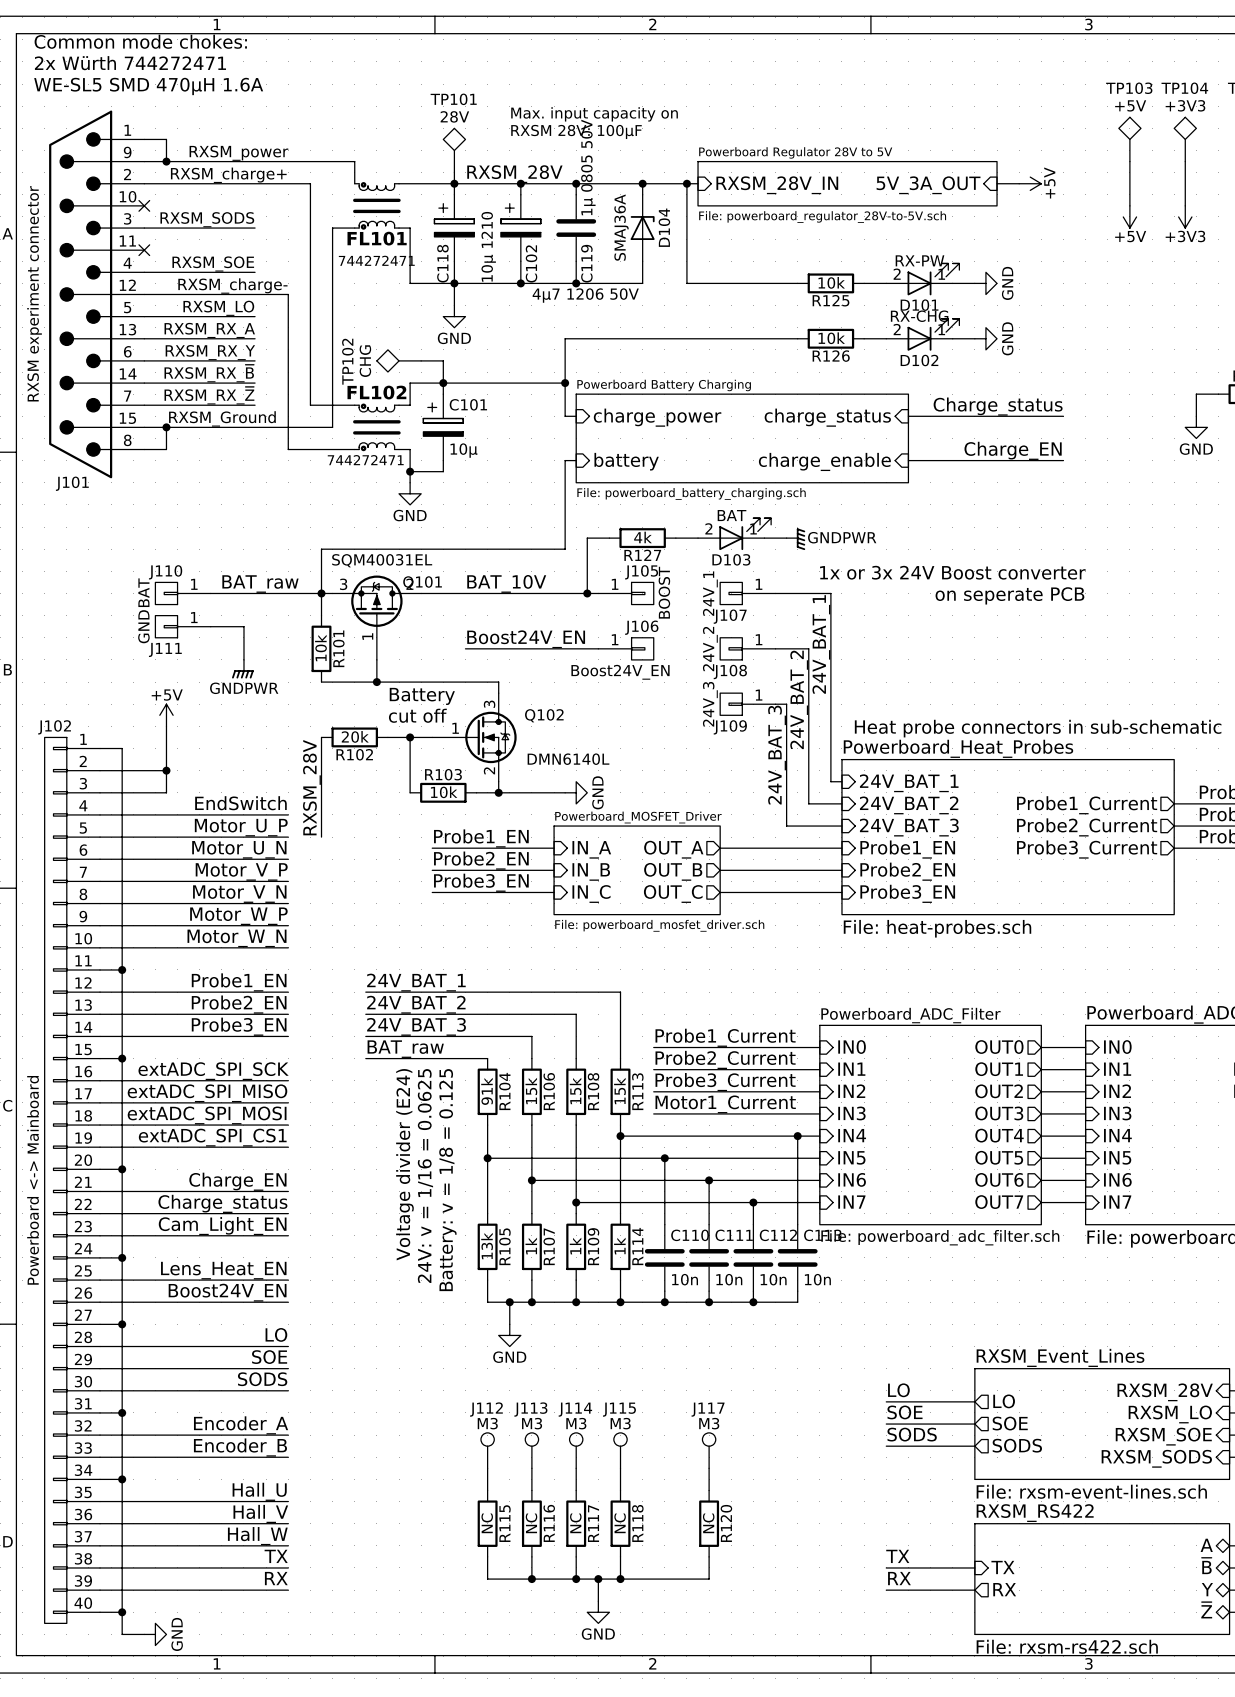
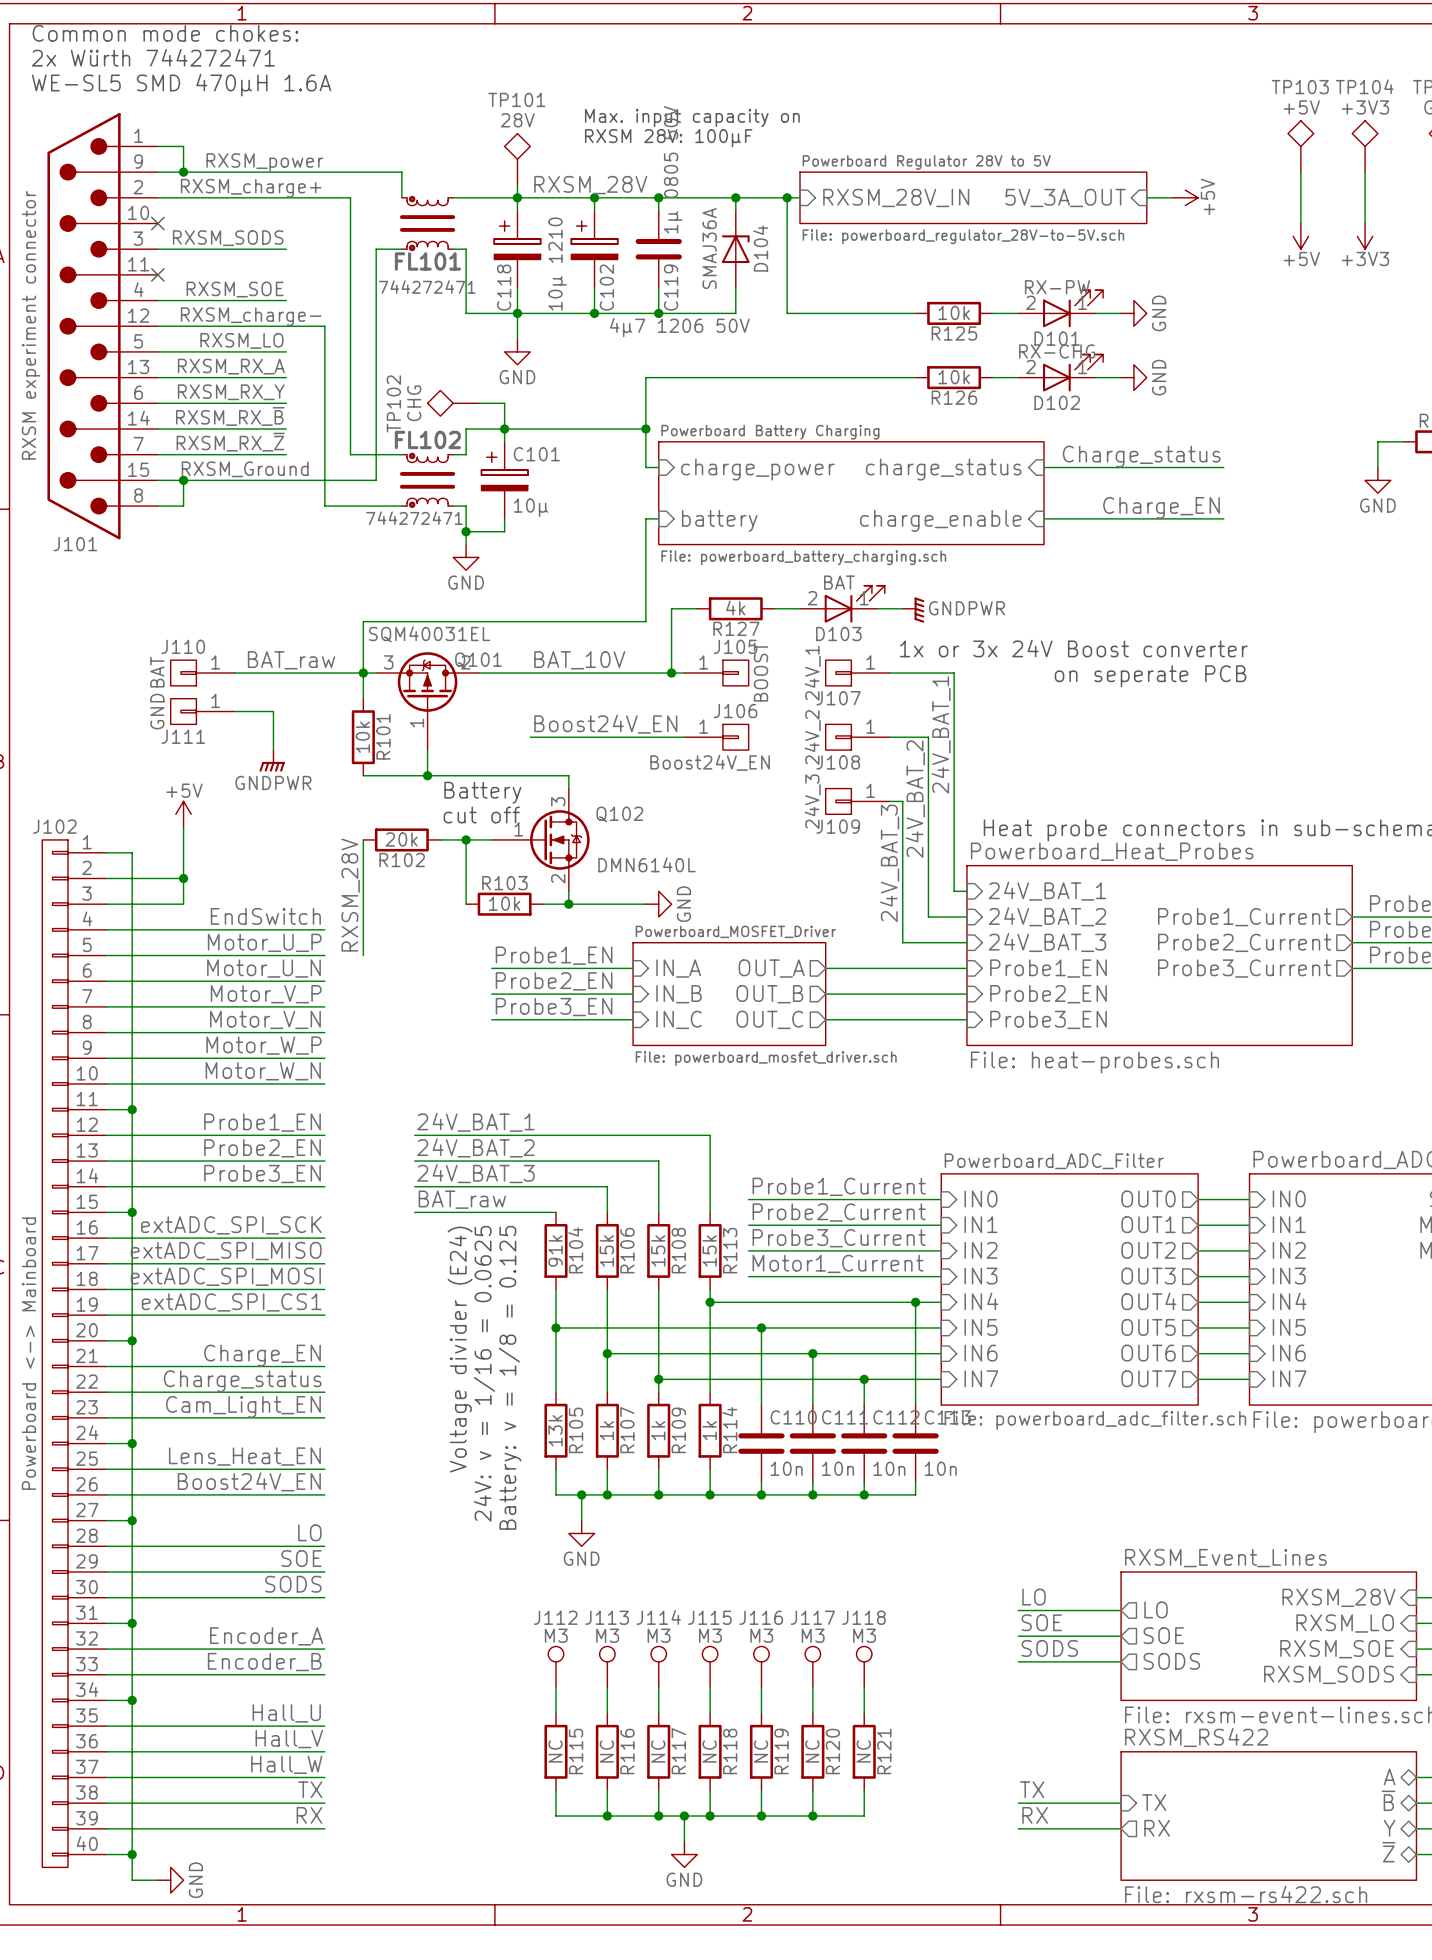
J116: none -> M3 (761, 1667)
J118: none -> M3 (864, 1667)
wire: none -> (761, 1687) (761, 1713)
wire: none -> (864, 1687) (864, 1713)
R119: none -> NC (761, 1751)
R121: none -> NC (864, 1751)
wire: none -> (761, 1790) (761, 1816)
wire: none -> (864, 1790) (864, 1816) (812, 1816)
junction: none -> (761, 1816)
junction: none -> (812, 1816)

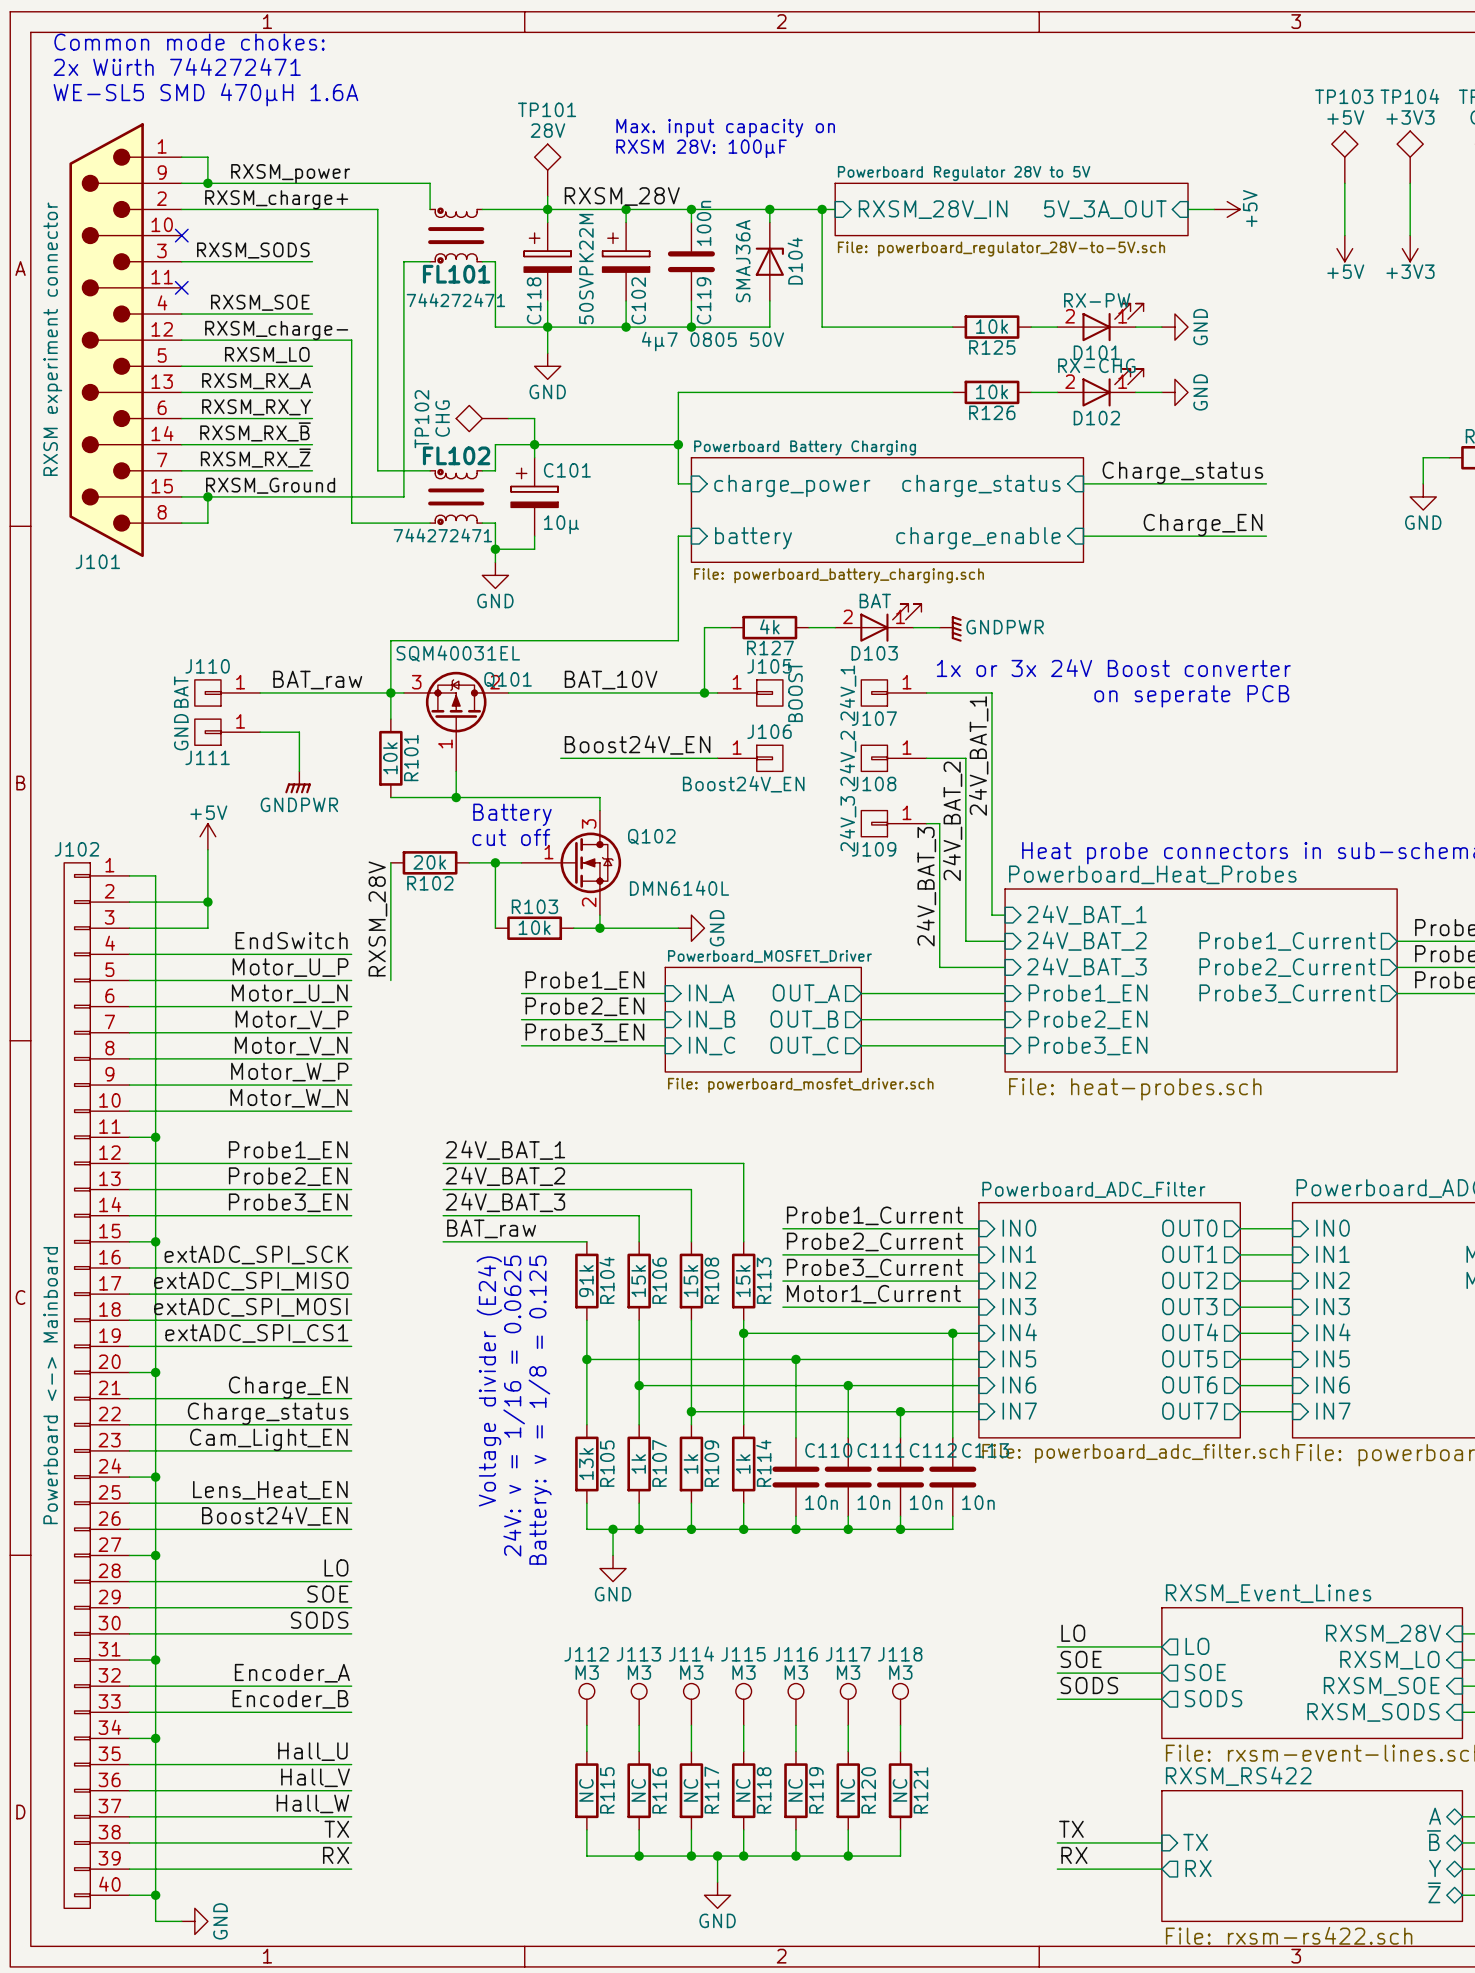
C119 value: 1µ 0805 50V (673, 169) -> 100n (704, 223)
C118 value: 10µ 1210 (557, 264) -> 50SVPK22M (586, 269)
C102 value: 4µ7 1206 50V (679, 327) -> 4µ7 0805 50V (713, 341)

